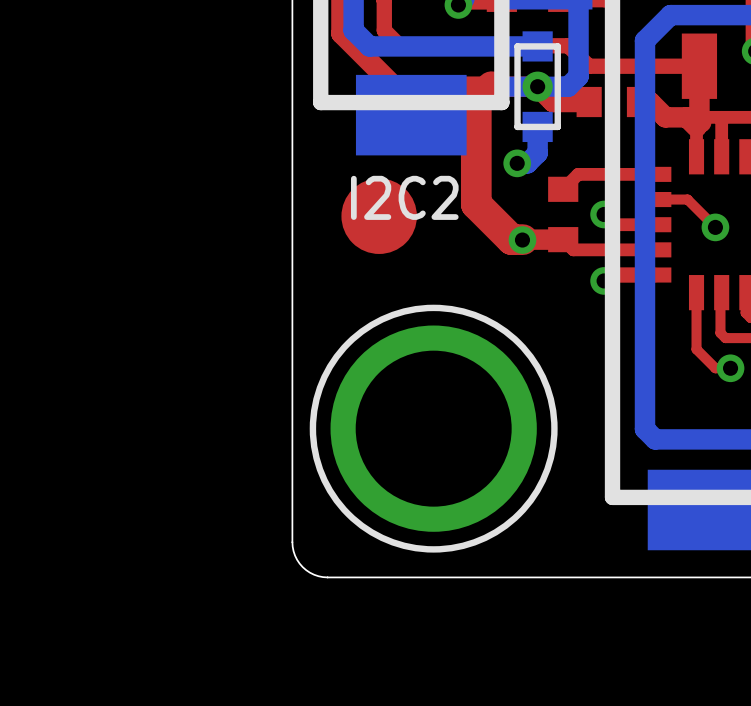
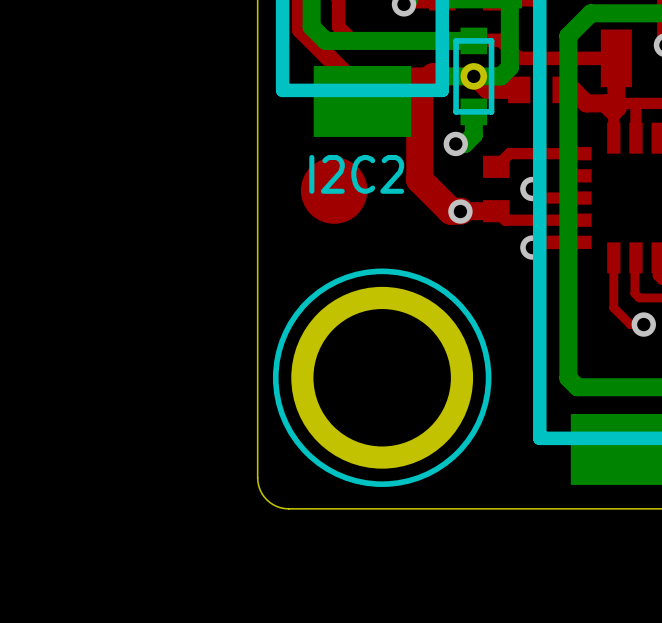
top track: (653, 199) (687, 199) (715, 227) -> none
via: (715, 227) -> none

